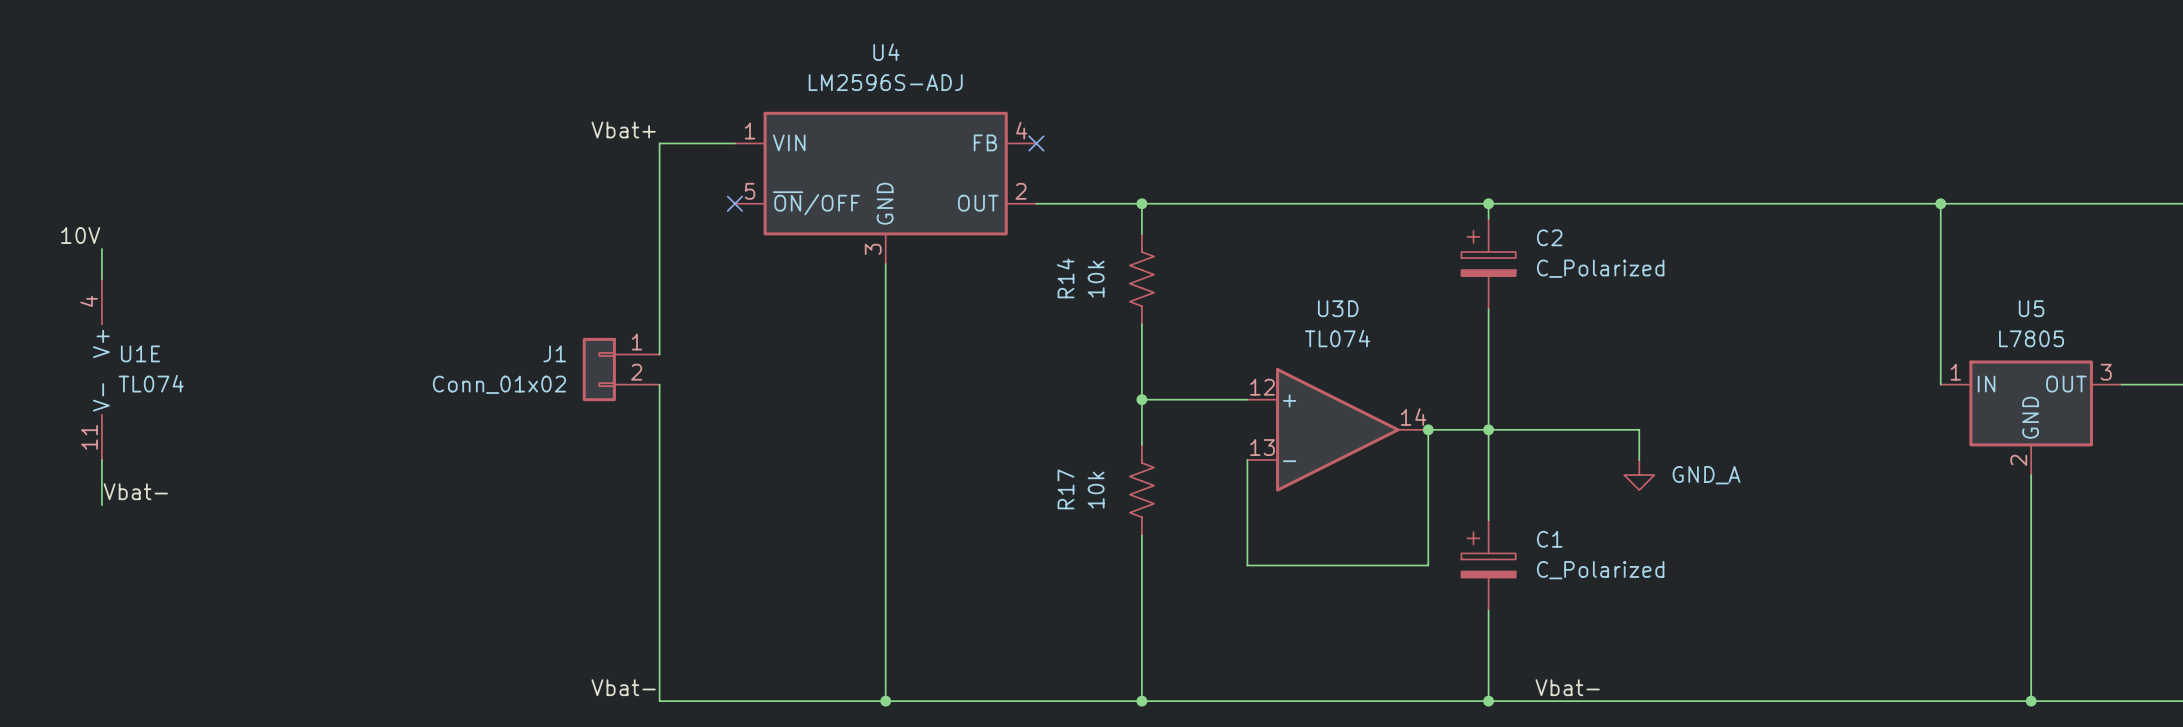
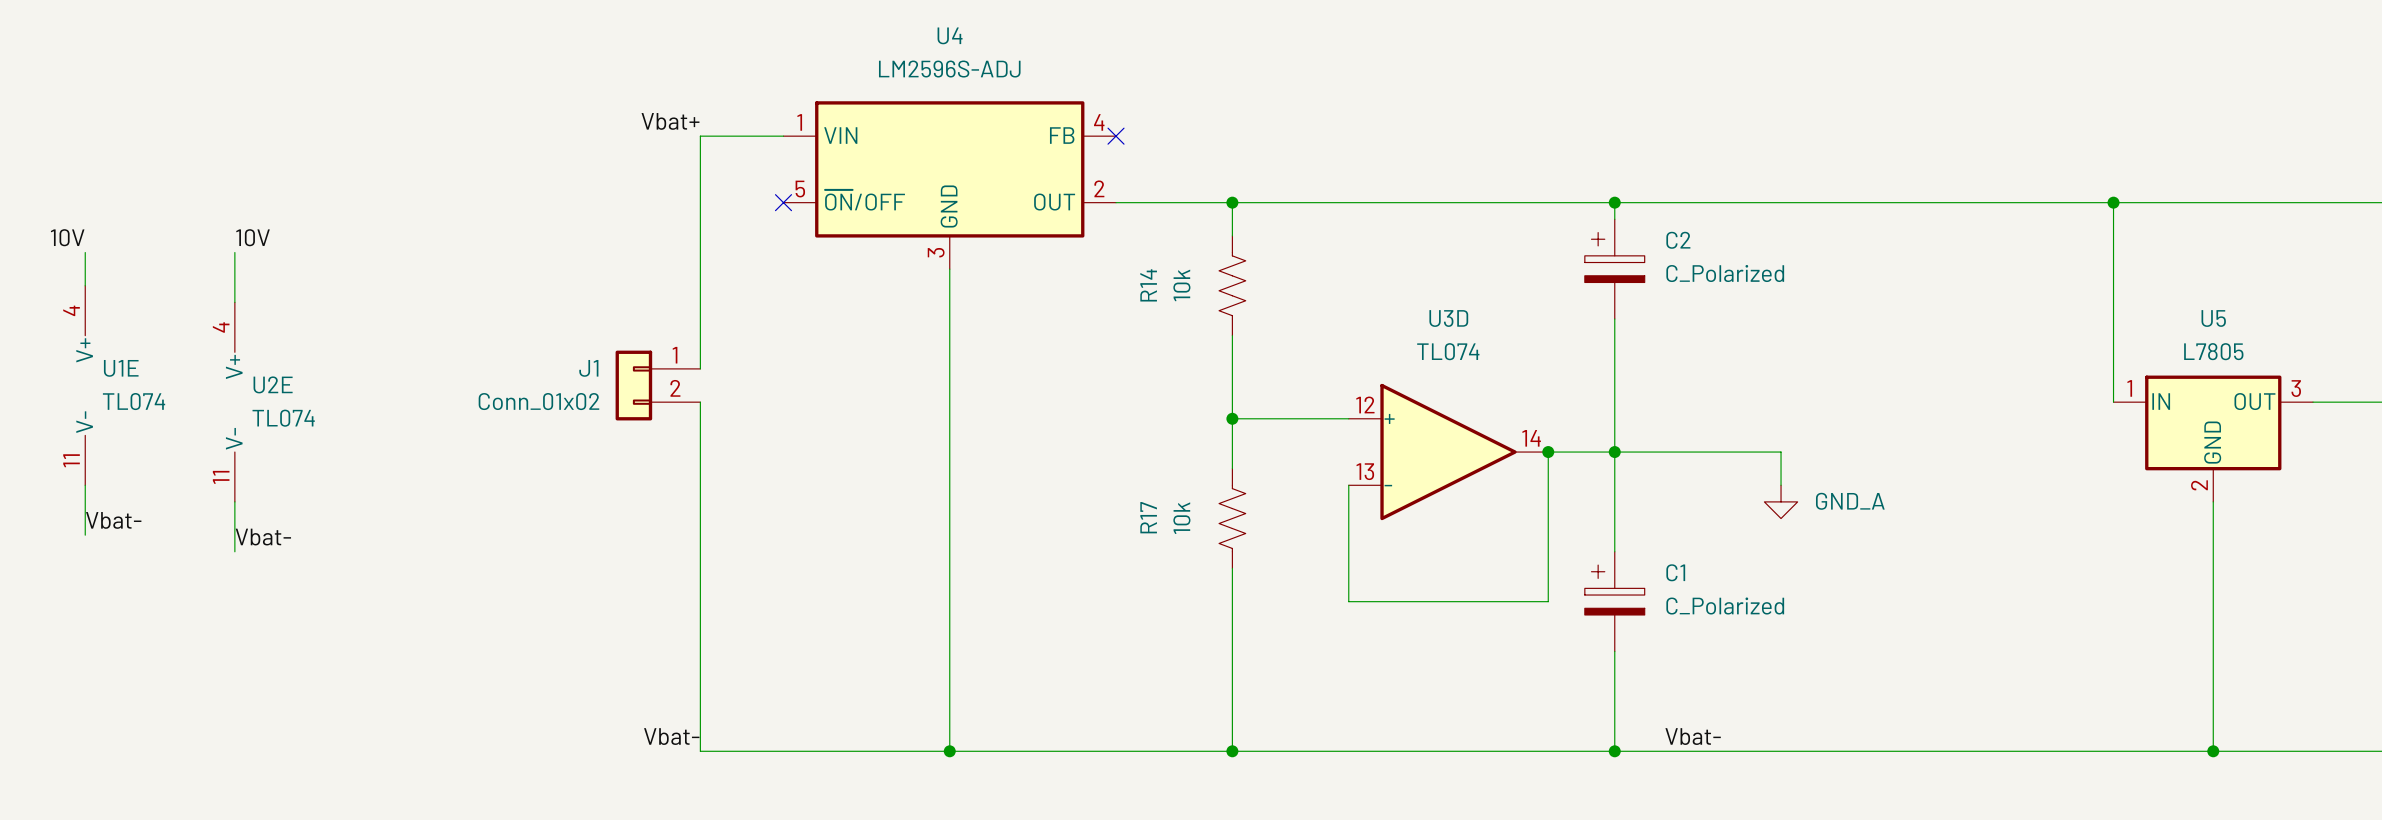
label: none -> 10V (253, 237)
wire: none -> (234, 252) (234, 302)
U2E: none -> TL074 (234, 402)
wire: none -> (234, 501) (234, 551)
label: none -> Vbat- (263, 537)

